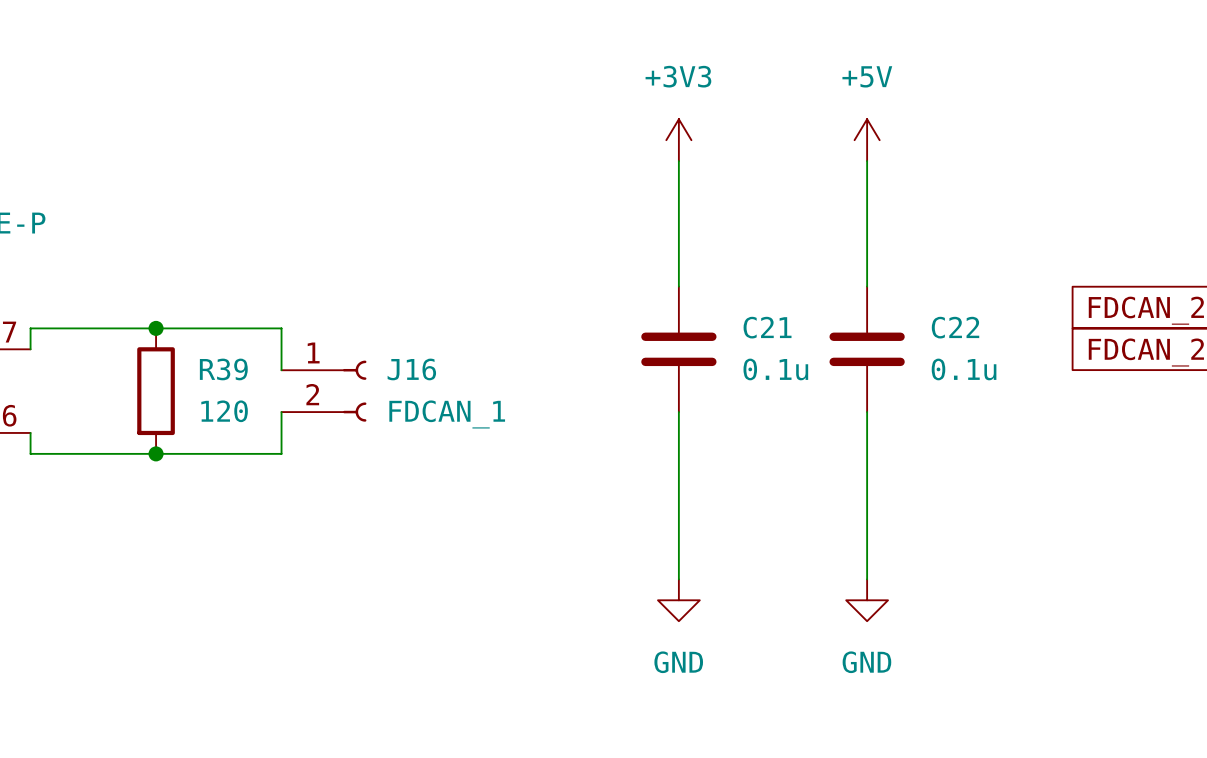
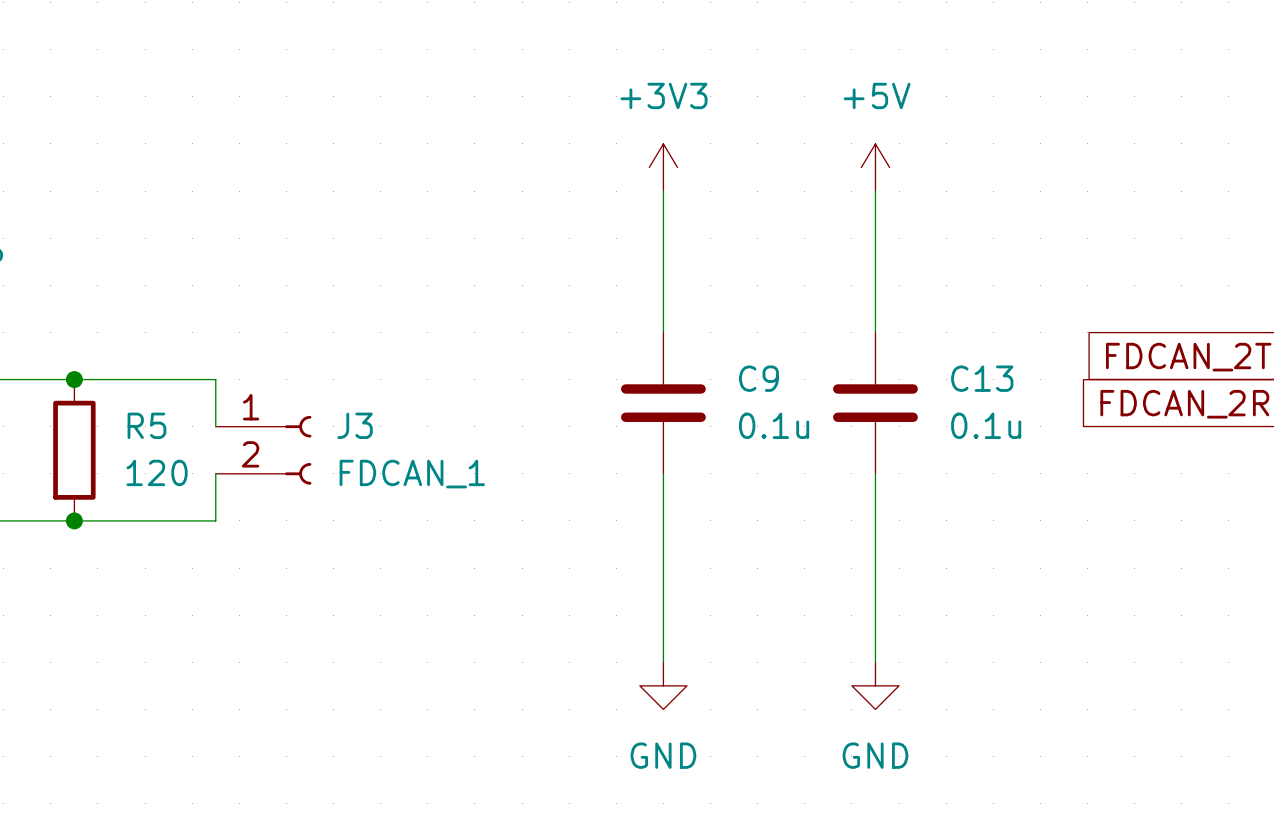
C21 name: C21 (767, 327) -> C9 (758, 378)
C22 name: C22 (955, 327) -> C13 (982, 378)
R39 name: R39 (223, 369) -> R5 (146, 425)
J16 name: J16 (411, 369) -> J3 (355, 425)

